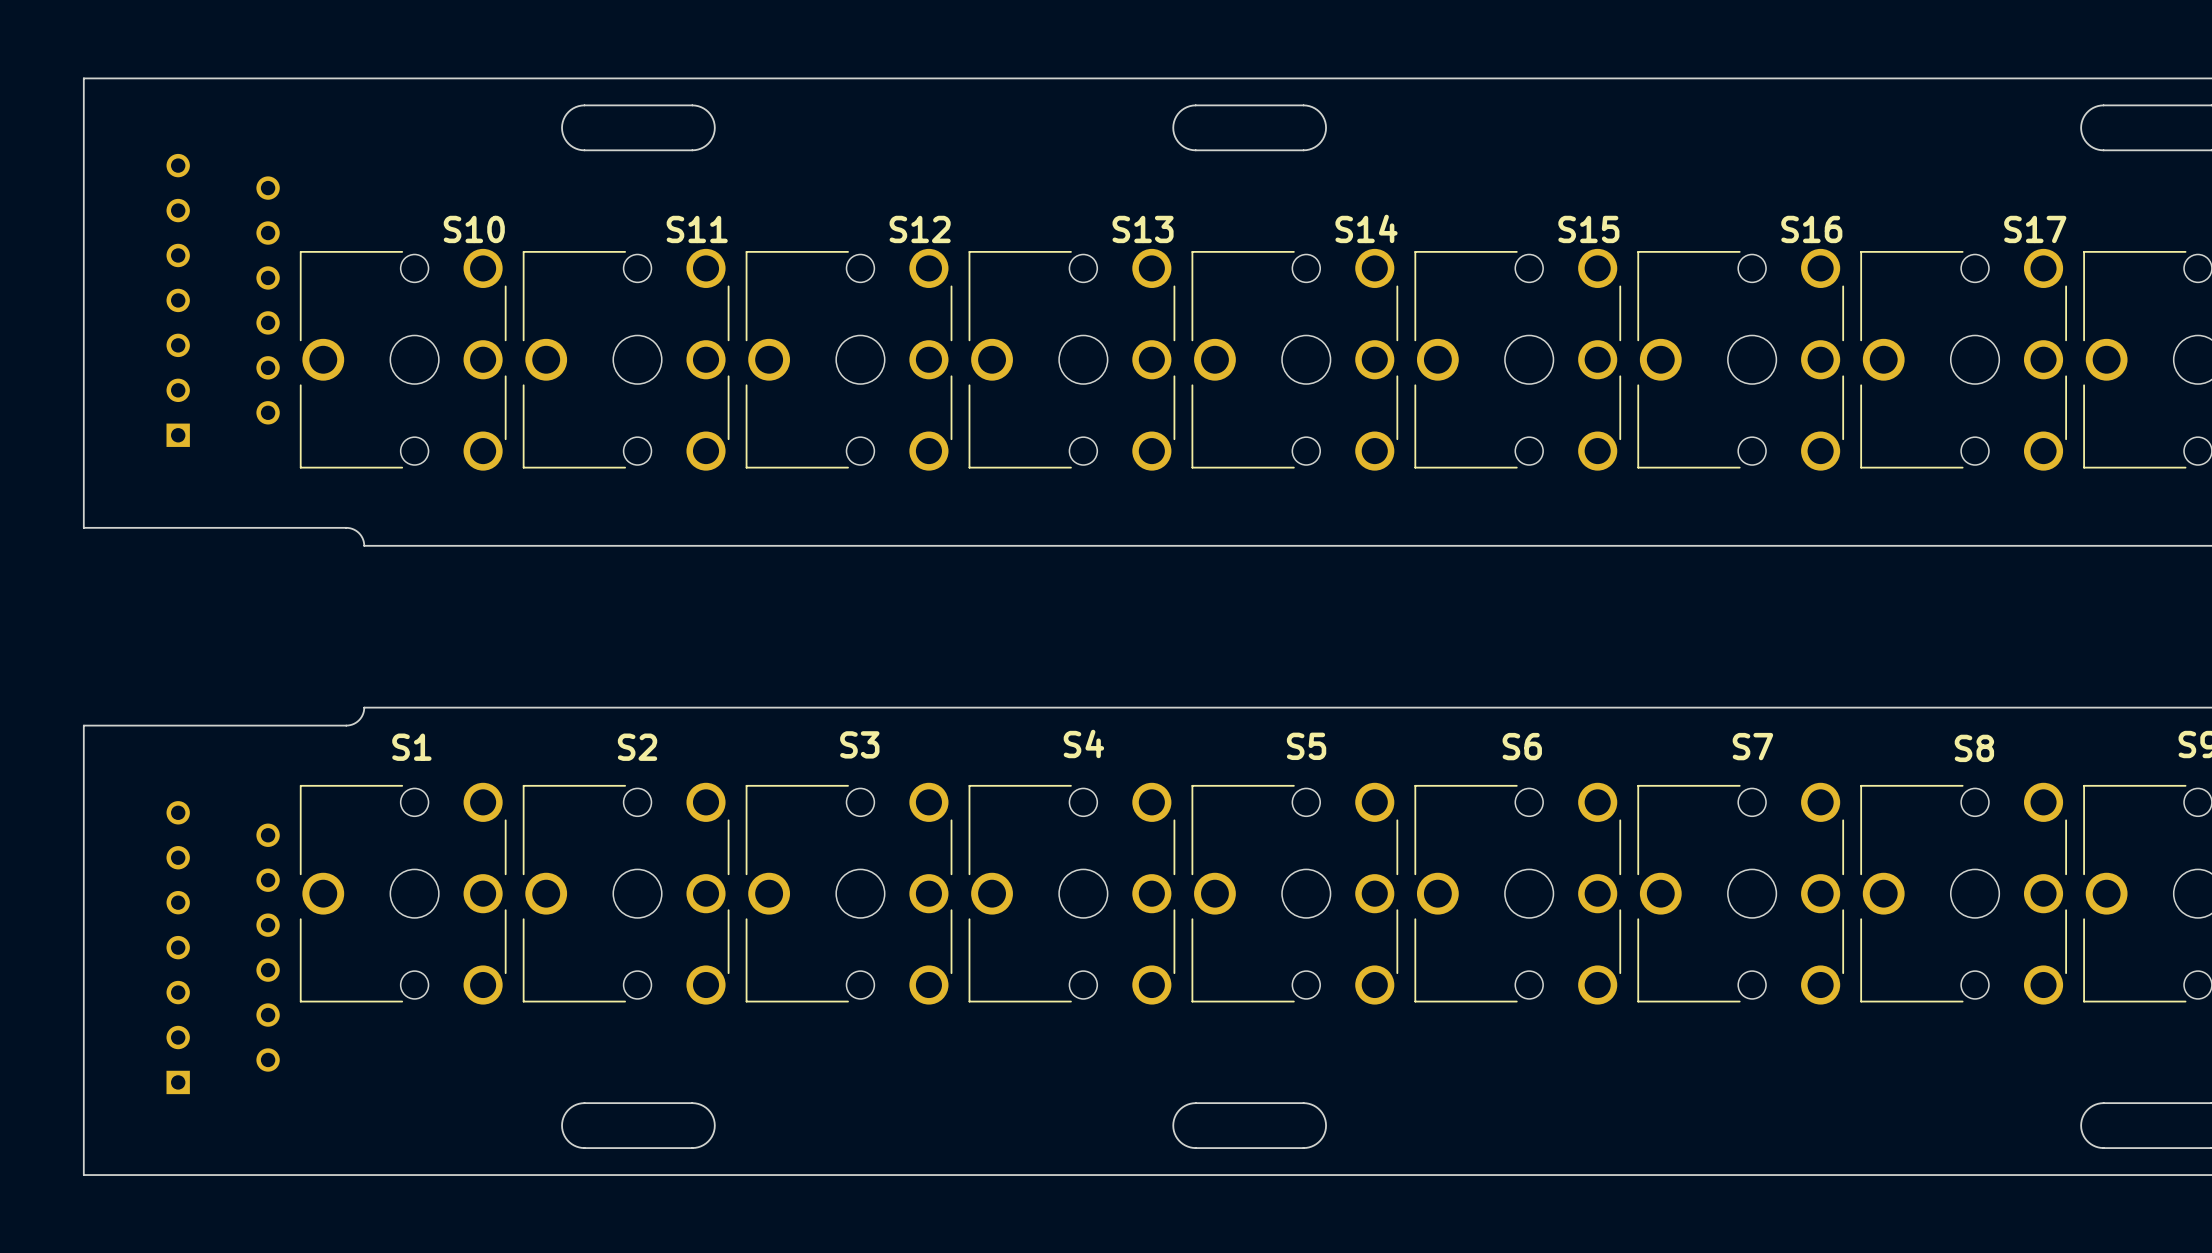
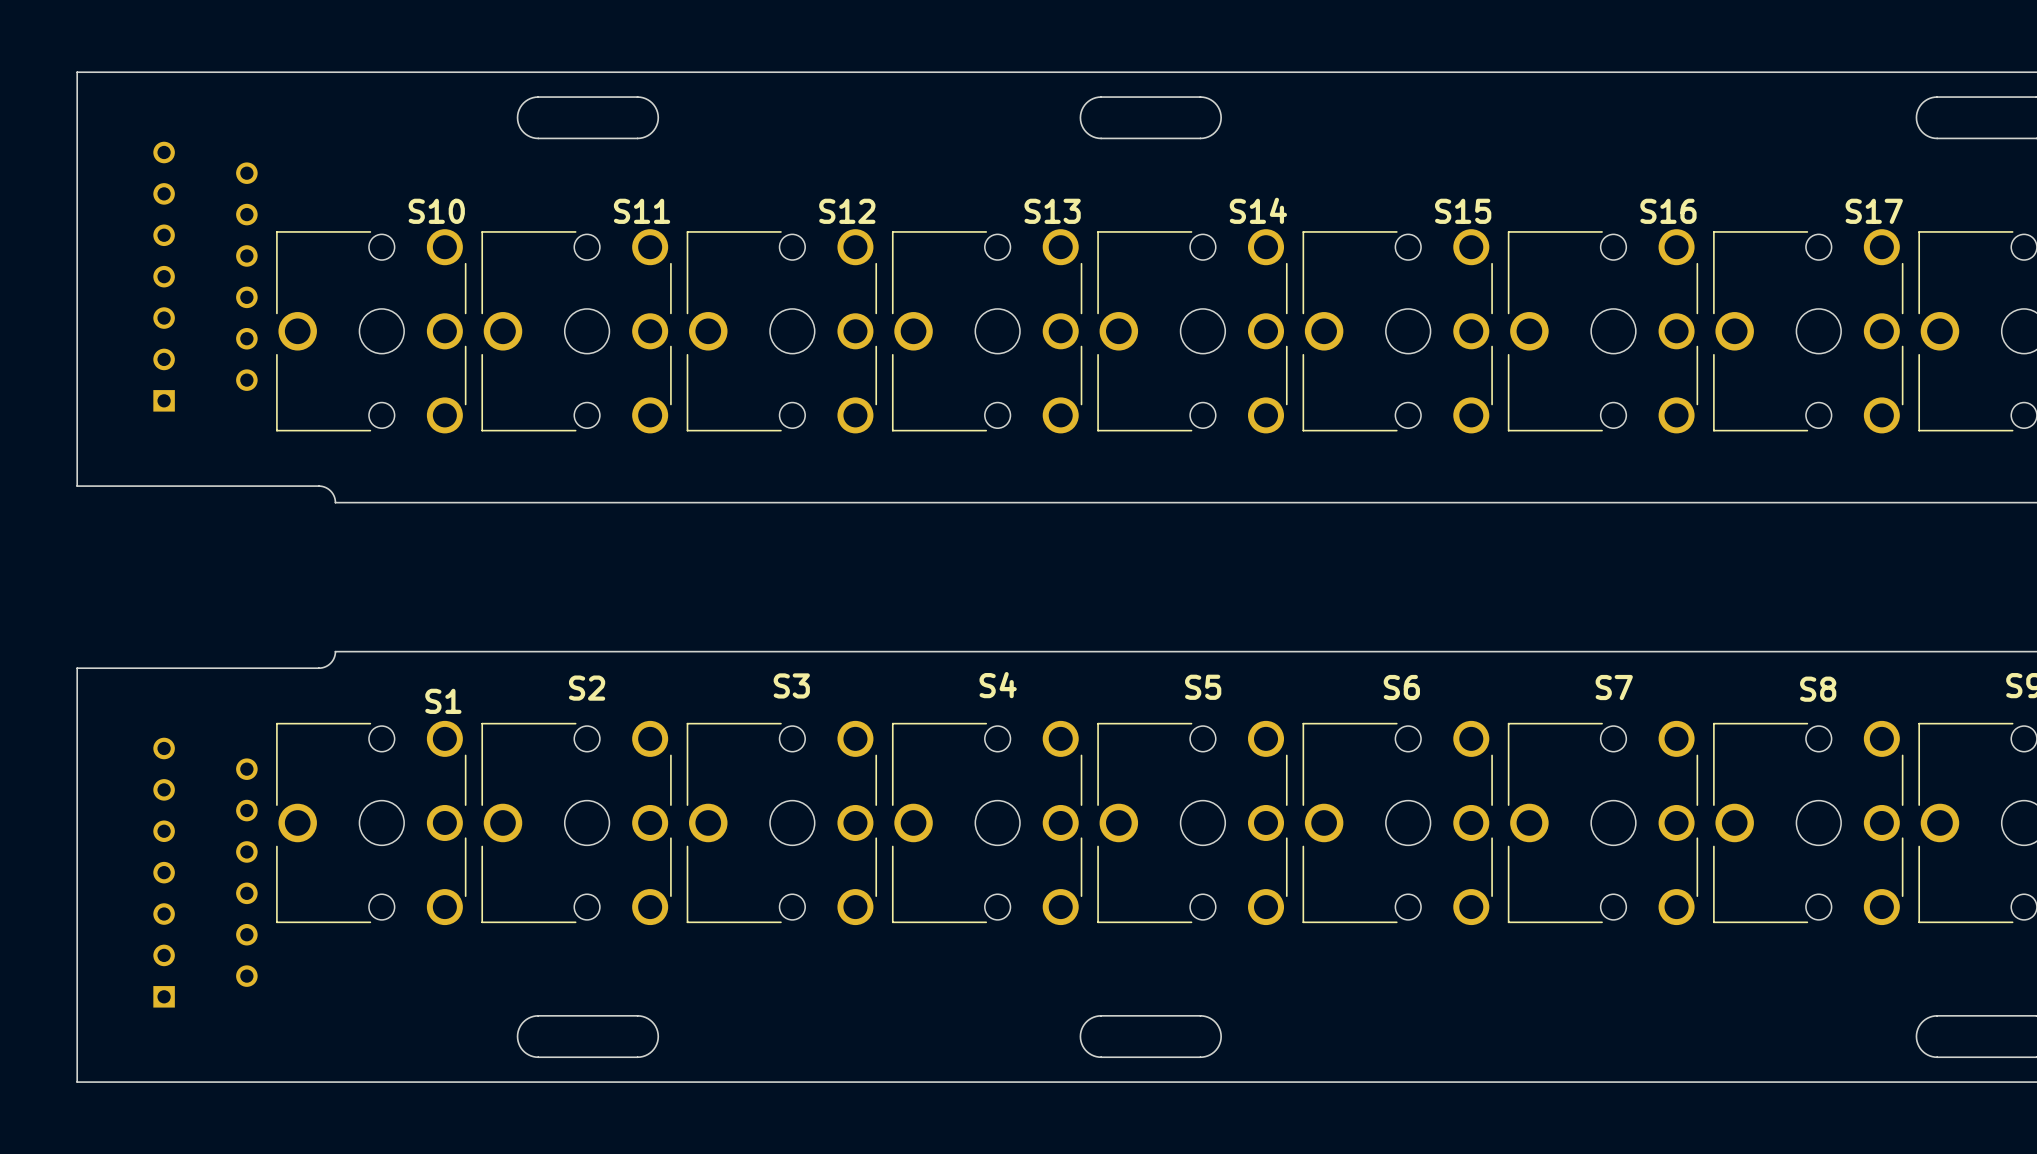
S1 name position: S1 (411, 747) -> S1 (443, 701)

